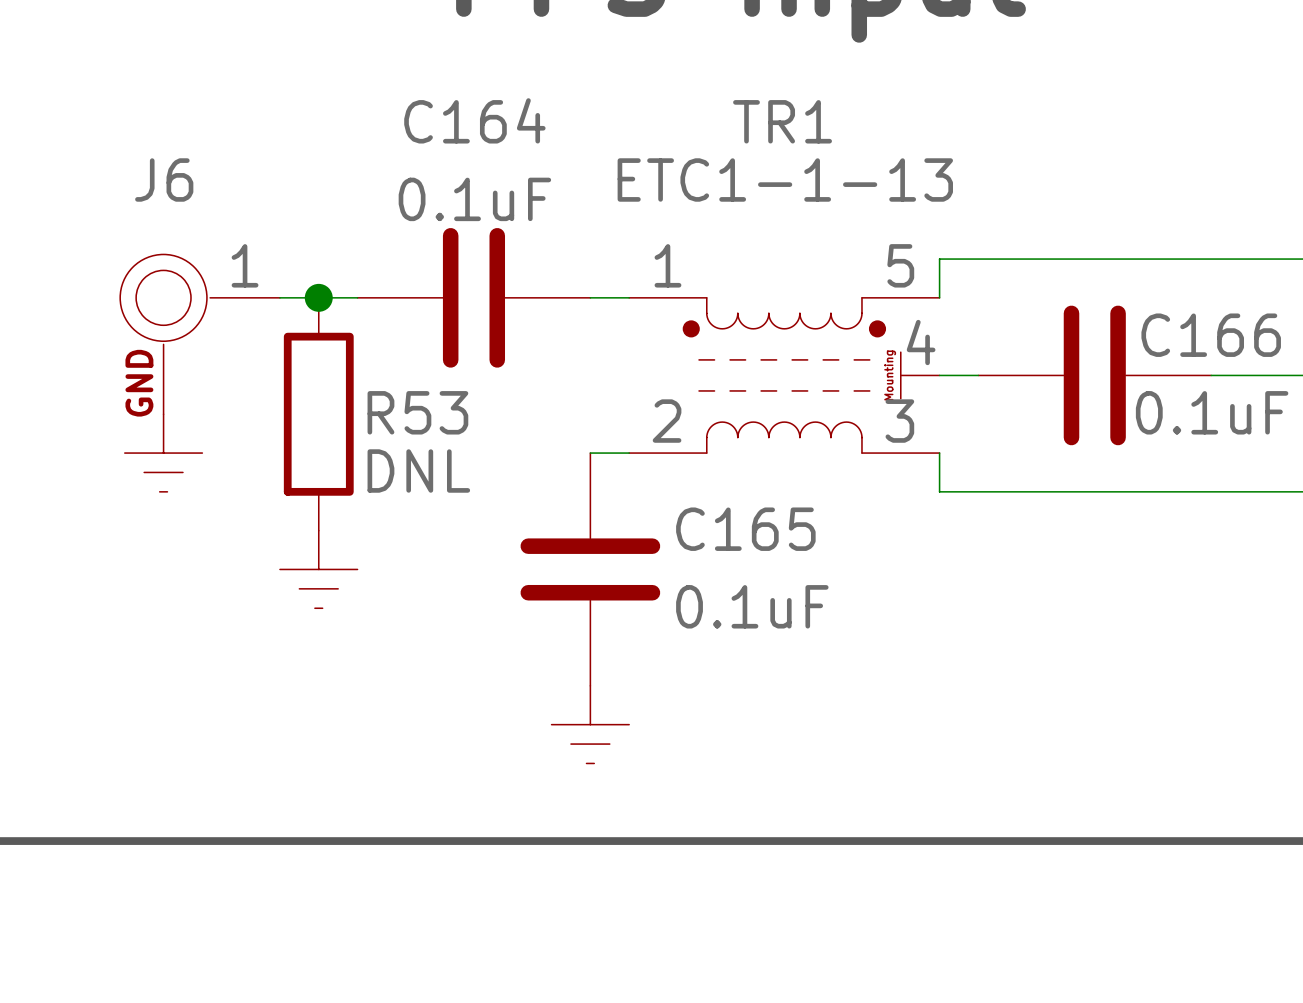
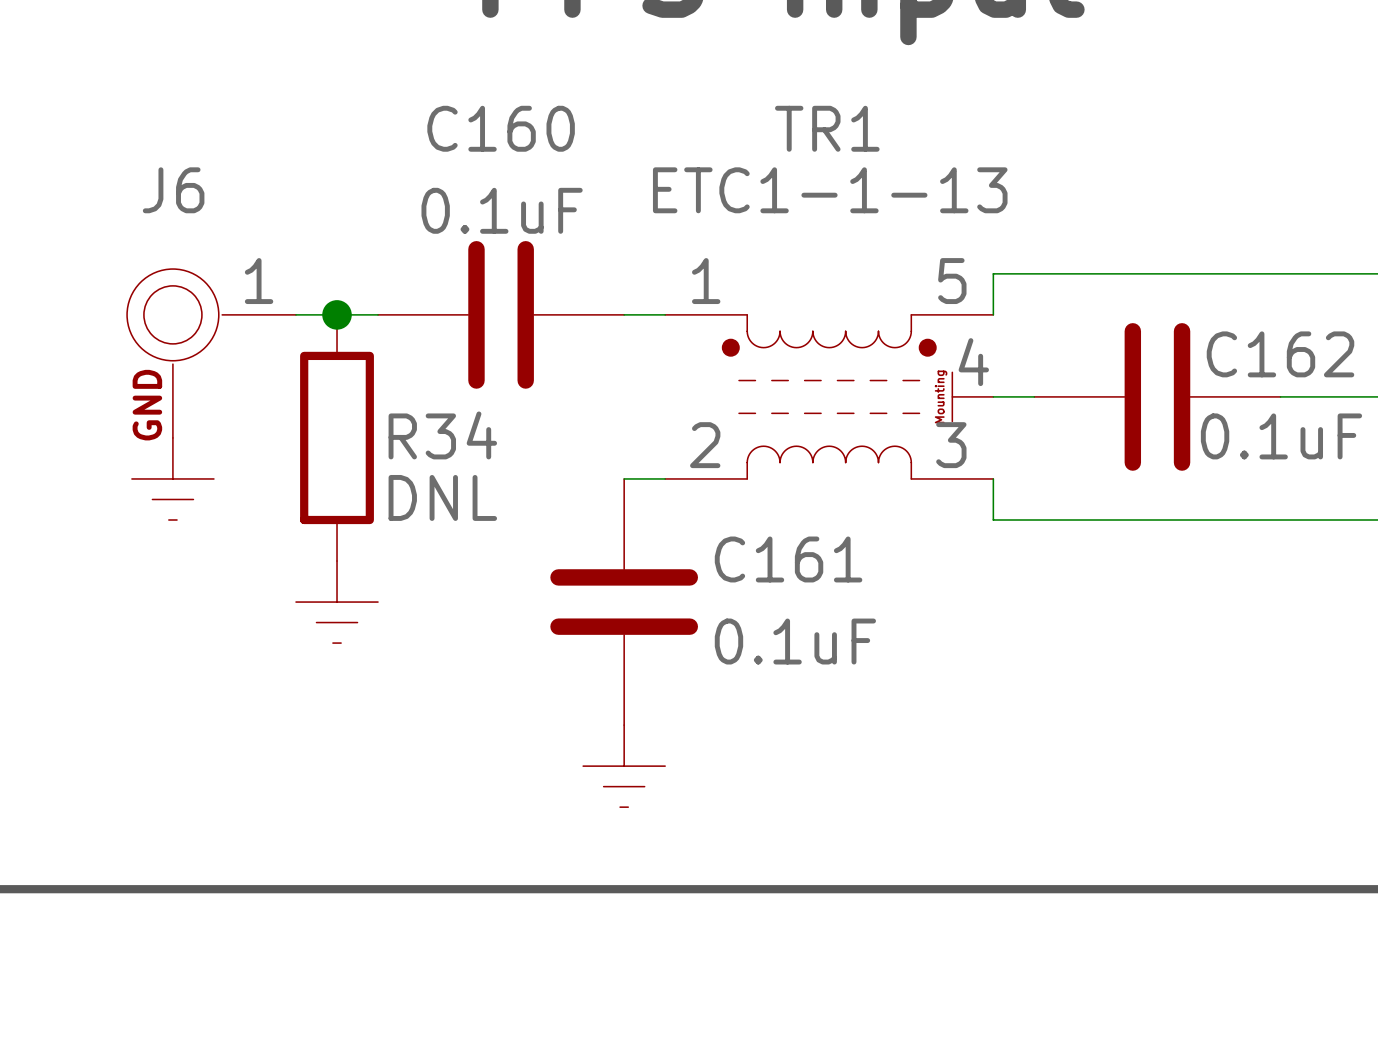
C164 name: C164 (474, 120) -> C160 (501, 128)
C166 name: C166 (1211, 335) -> C162 (1280, 354)
R53 name: R53 (417, 412) -> R34 (442, 435)
C165 name: C165 (745, 529) -> C161 (788, 559)

